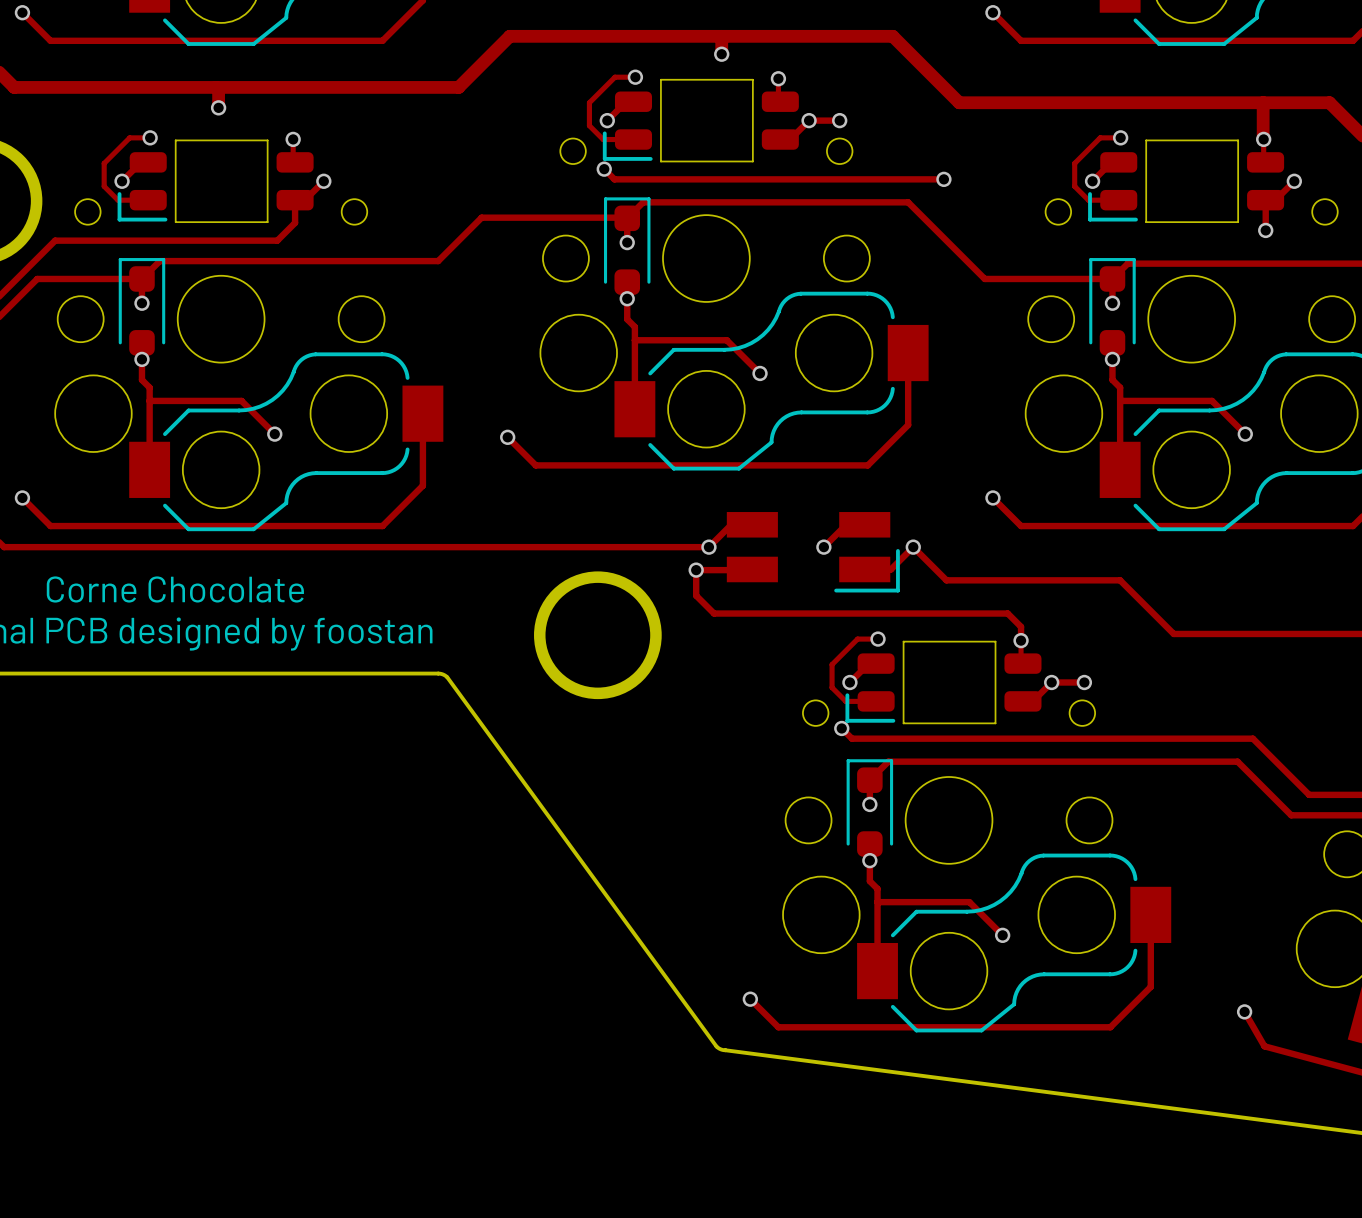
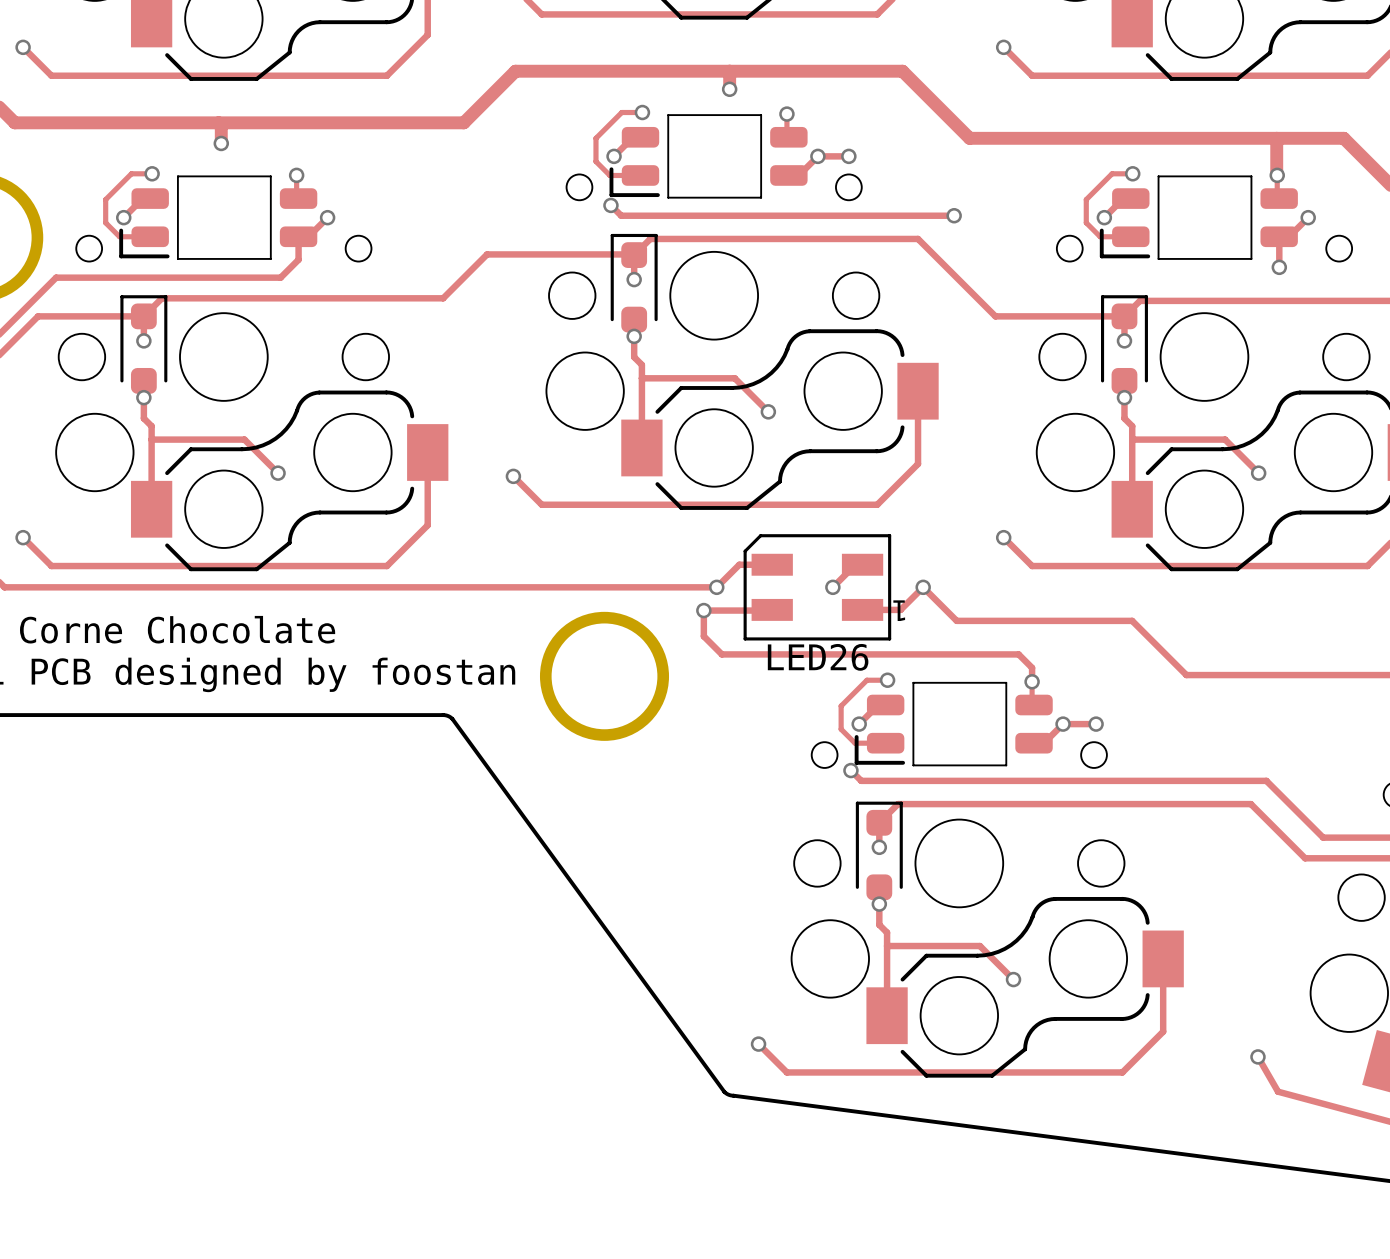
LED26: none -> (817, 587)
part: (813, 552) -> none

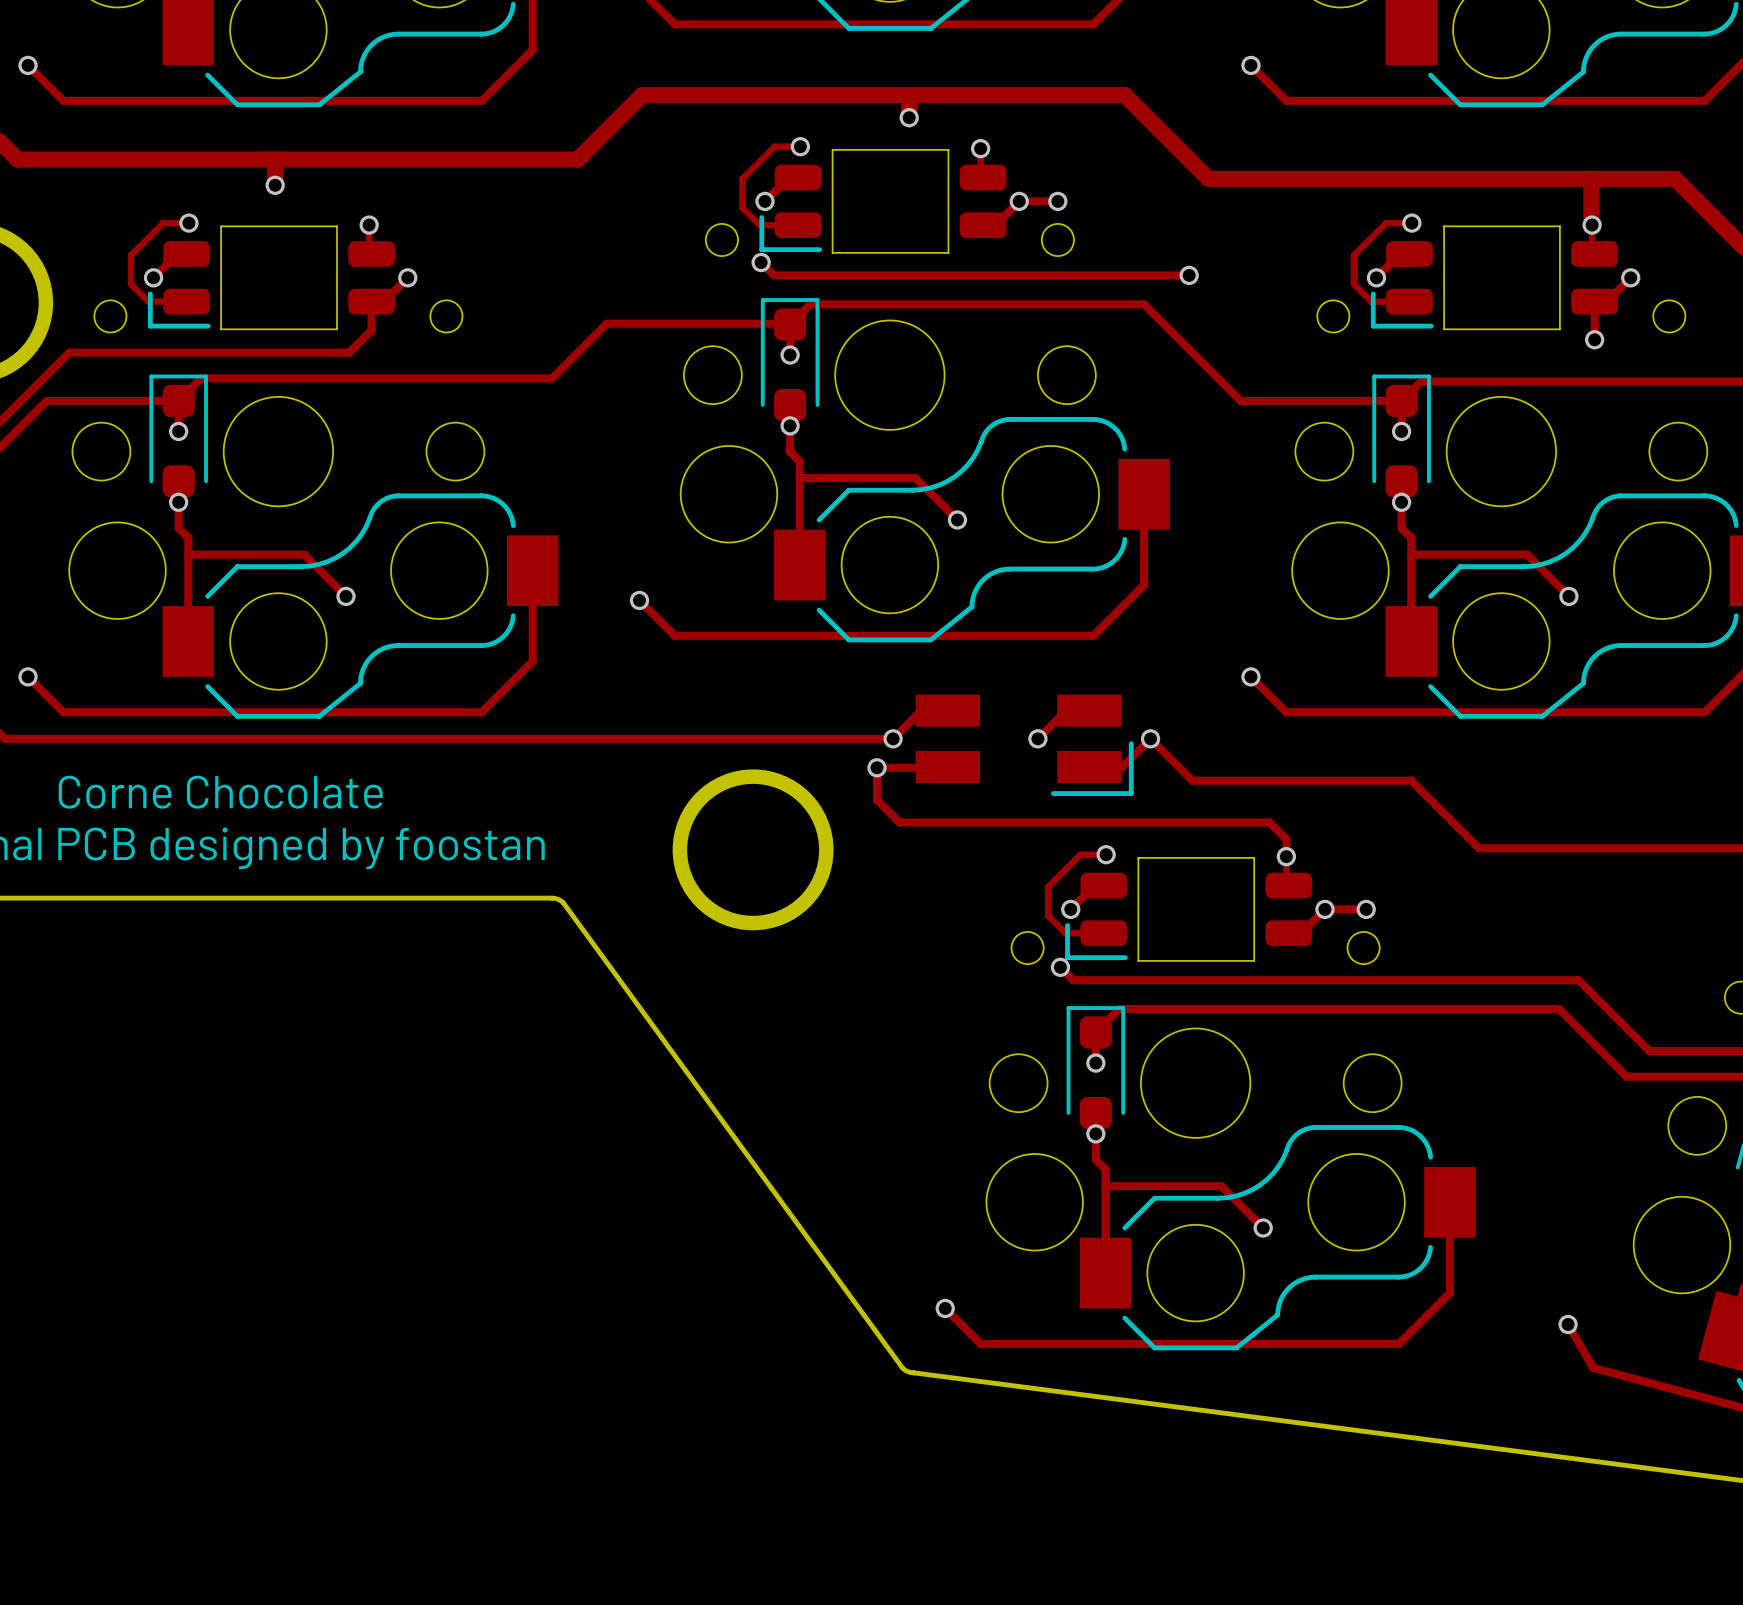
LED26: (817, 587) -> none
part: none -> (1024, 745)

